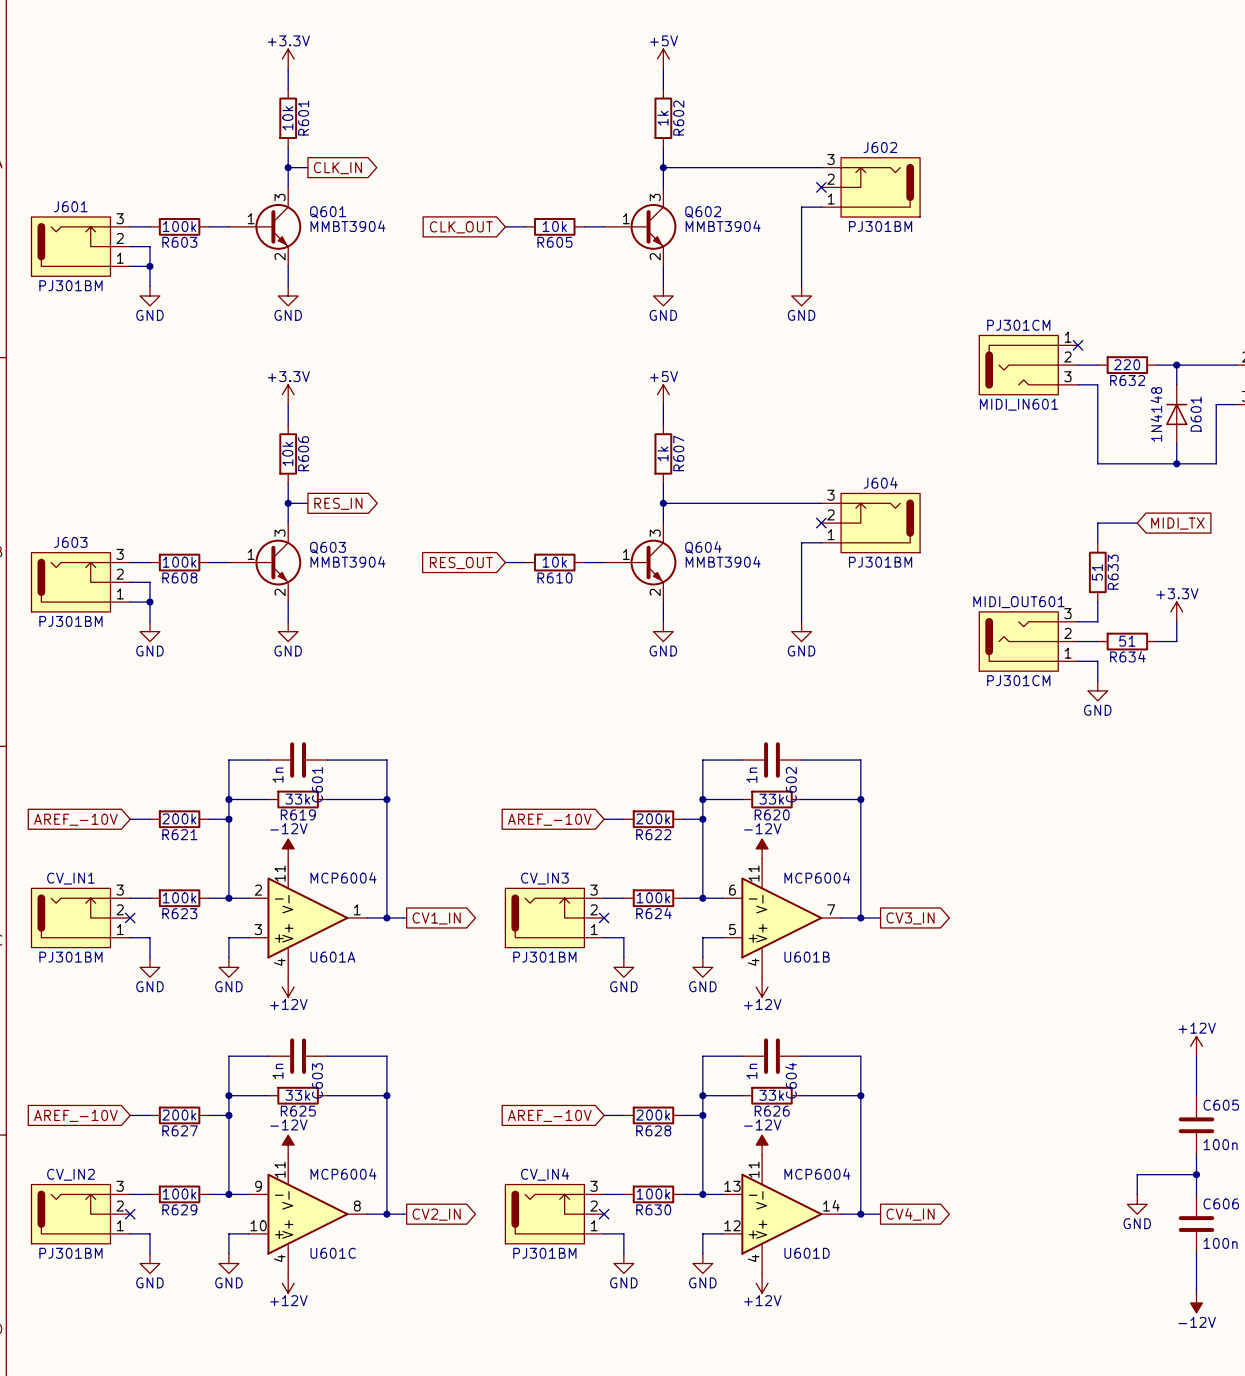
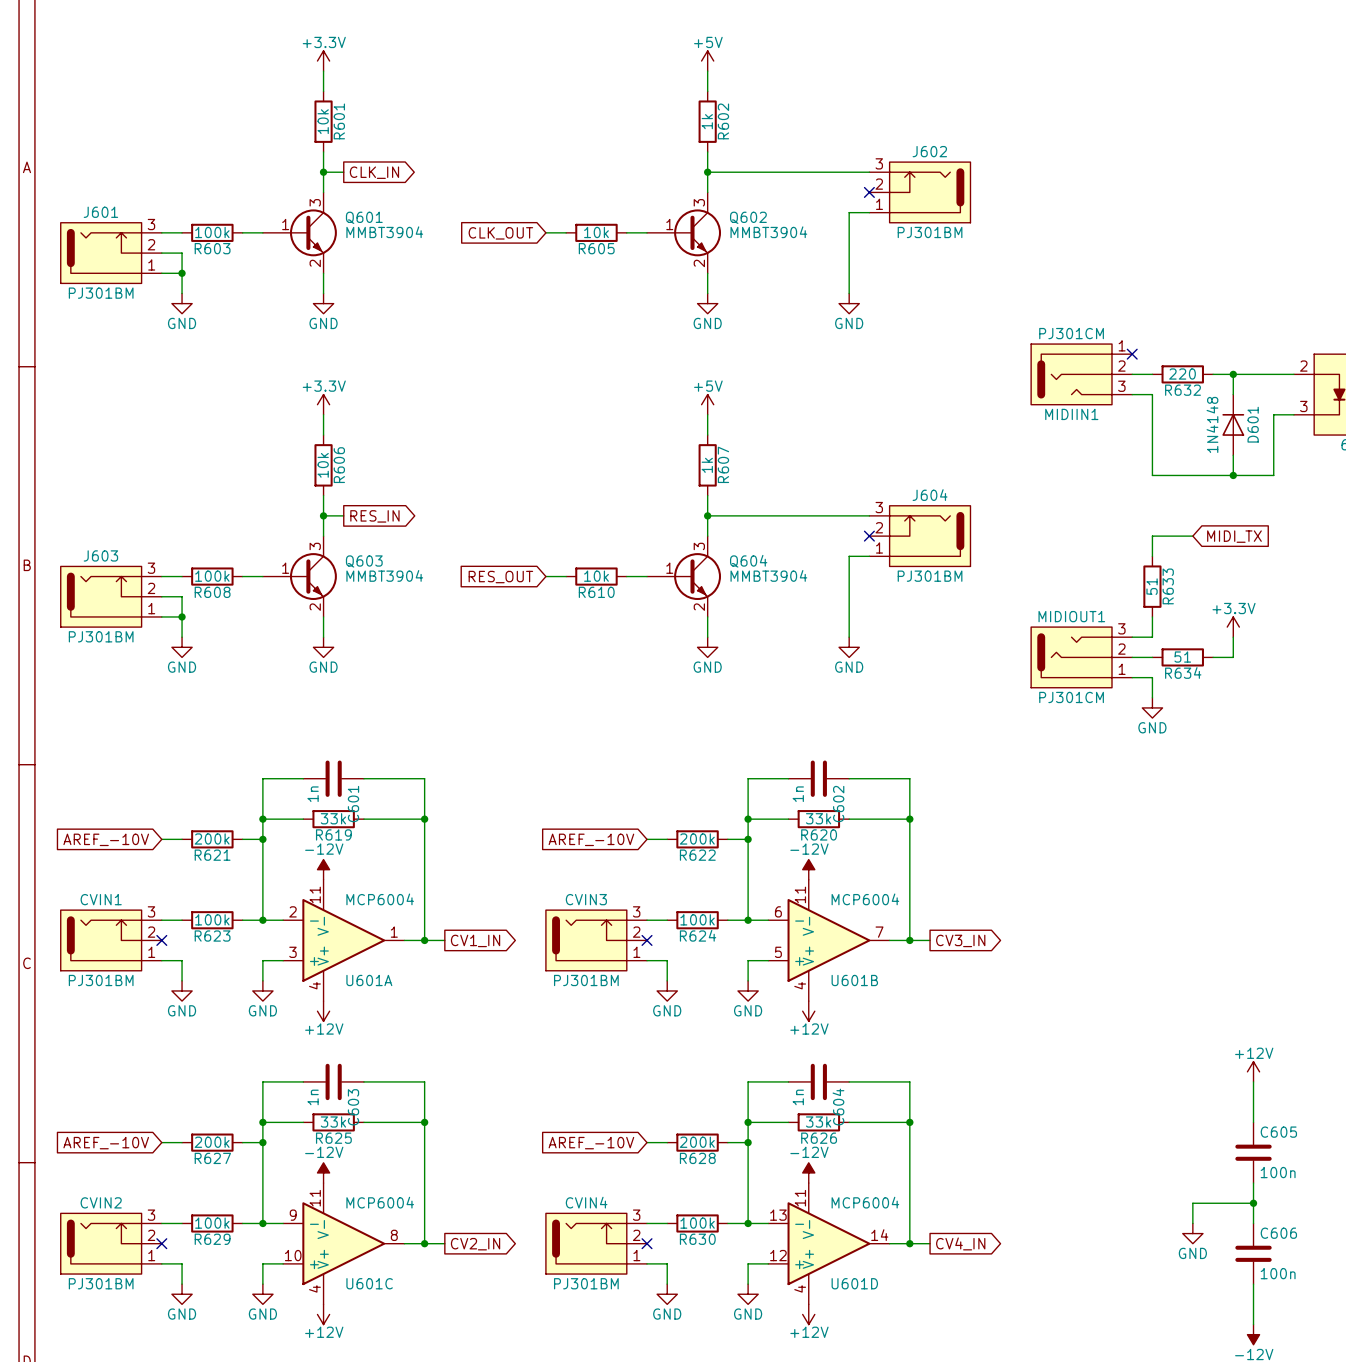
MIDI_IN601 name: MIDI_IN601 (1019, 404) -> MIDIIN1 (1071, 414)
MIDI_OUT601 name: MIDI_OUT601 (1019, 602) -> MIDIOUT1 (1071, 616)
CV_IN1 name: CV_IN1 (70, 878) -> CVIN1 (101, 899)
CV_IN3 name: CV_IN3 (544, 878) -> CVIN3 (586, 899)
CV_IN2 name: CV_IN2 (70, 1174) -> CVIN2 (101, 1202)
CV_IN4 name: CV_IN4 (545, 1174) -> CVIN4 (586, 1202)

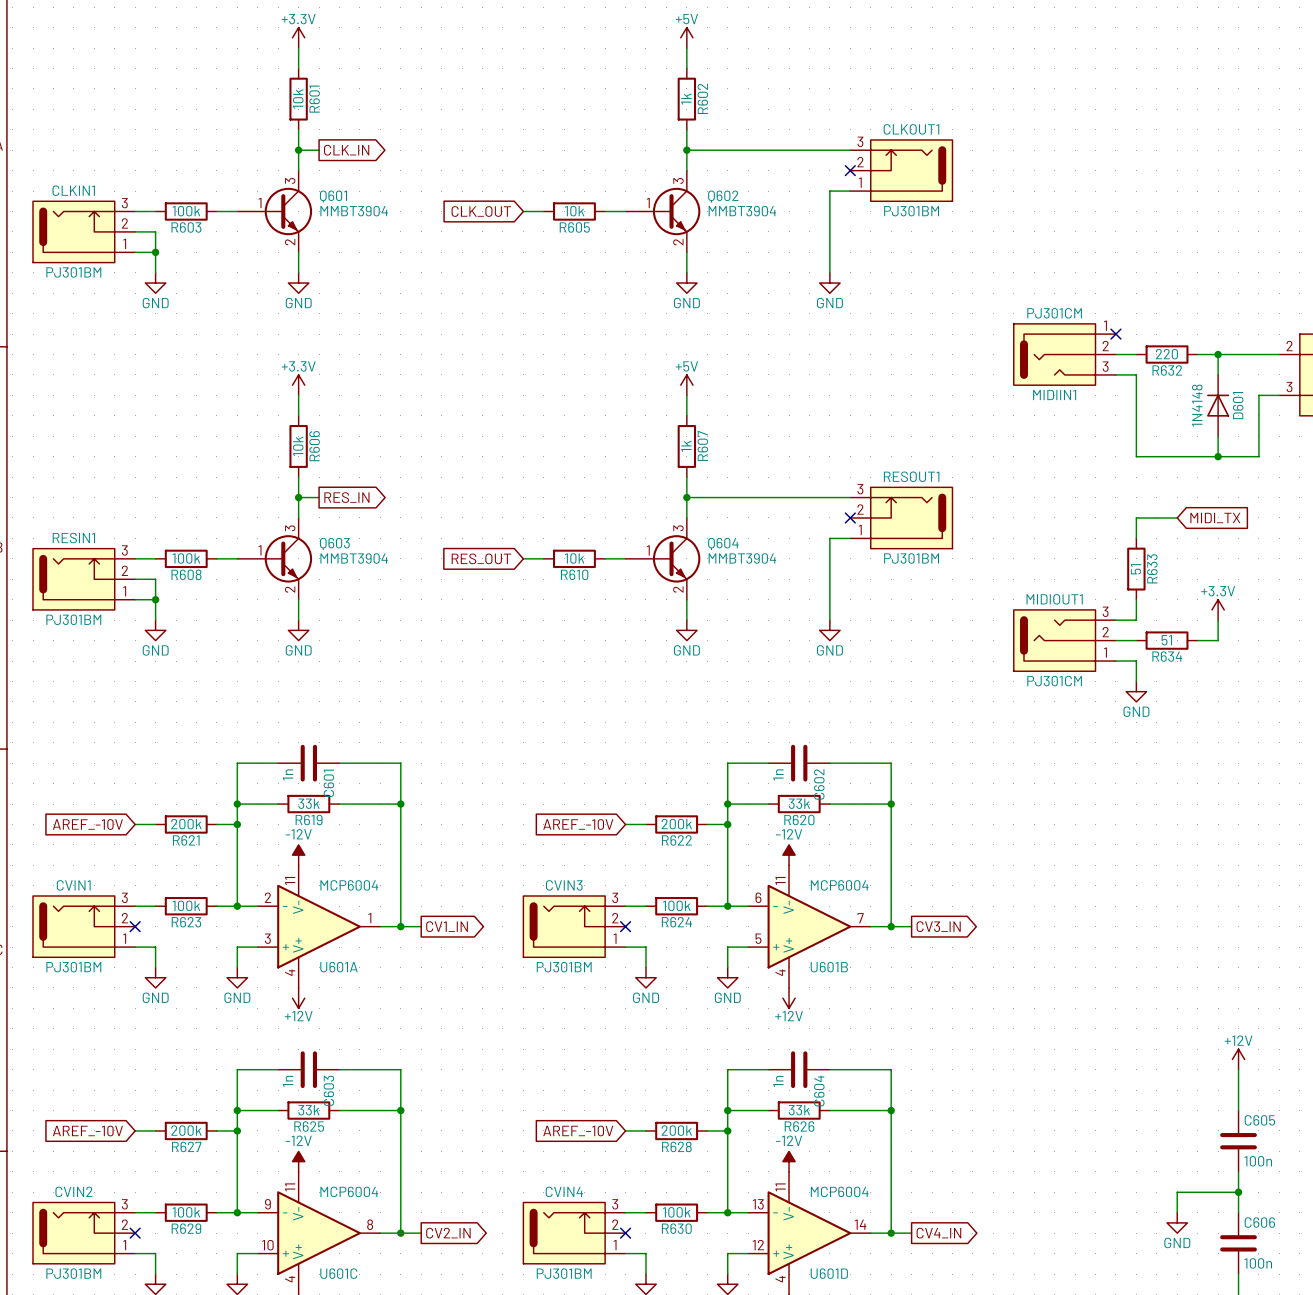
J602 name: J602 (929, 151) -> CLKOUT1 (911, 129)
J601 name: J601 (100, 212) -> CLKIN1 (73, 190)
J604 name: J604 (930, 495) -> RESOUT1 (911, 476)
J603 name: J603 (100, 555) -> RESIN1 (73, 538)

